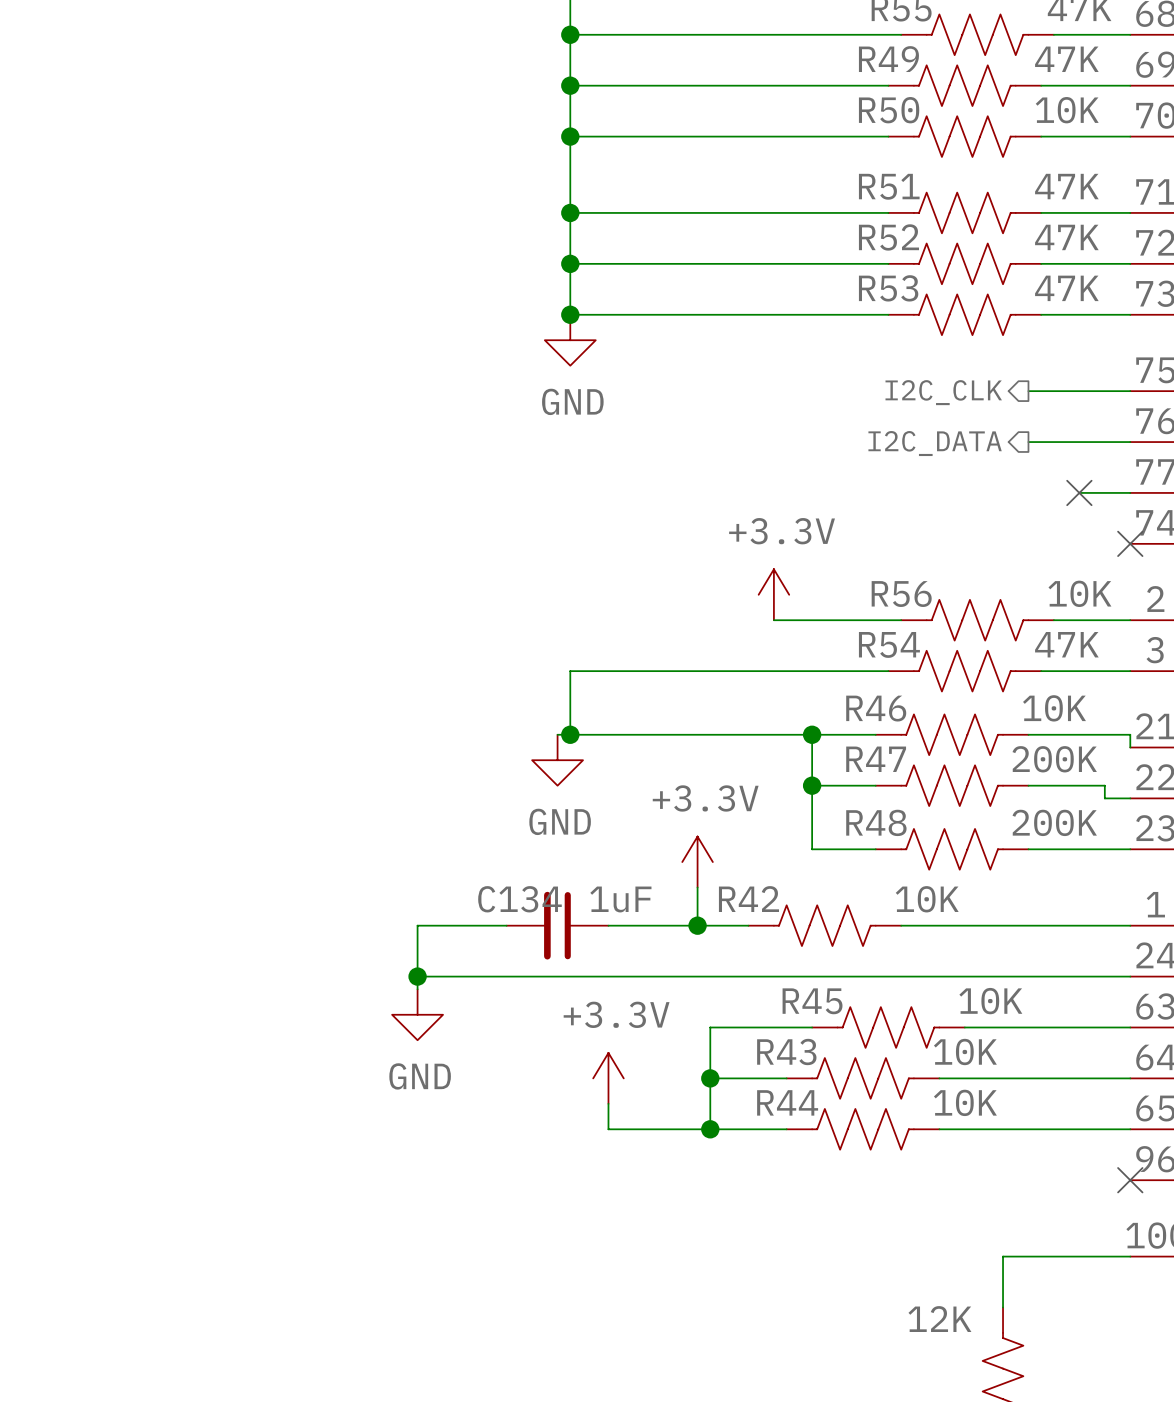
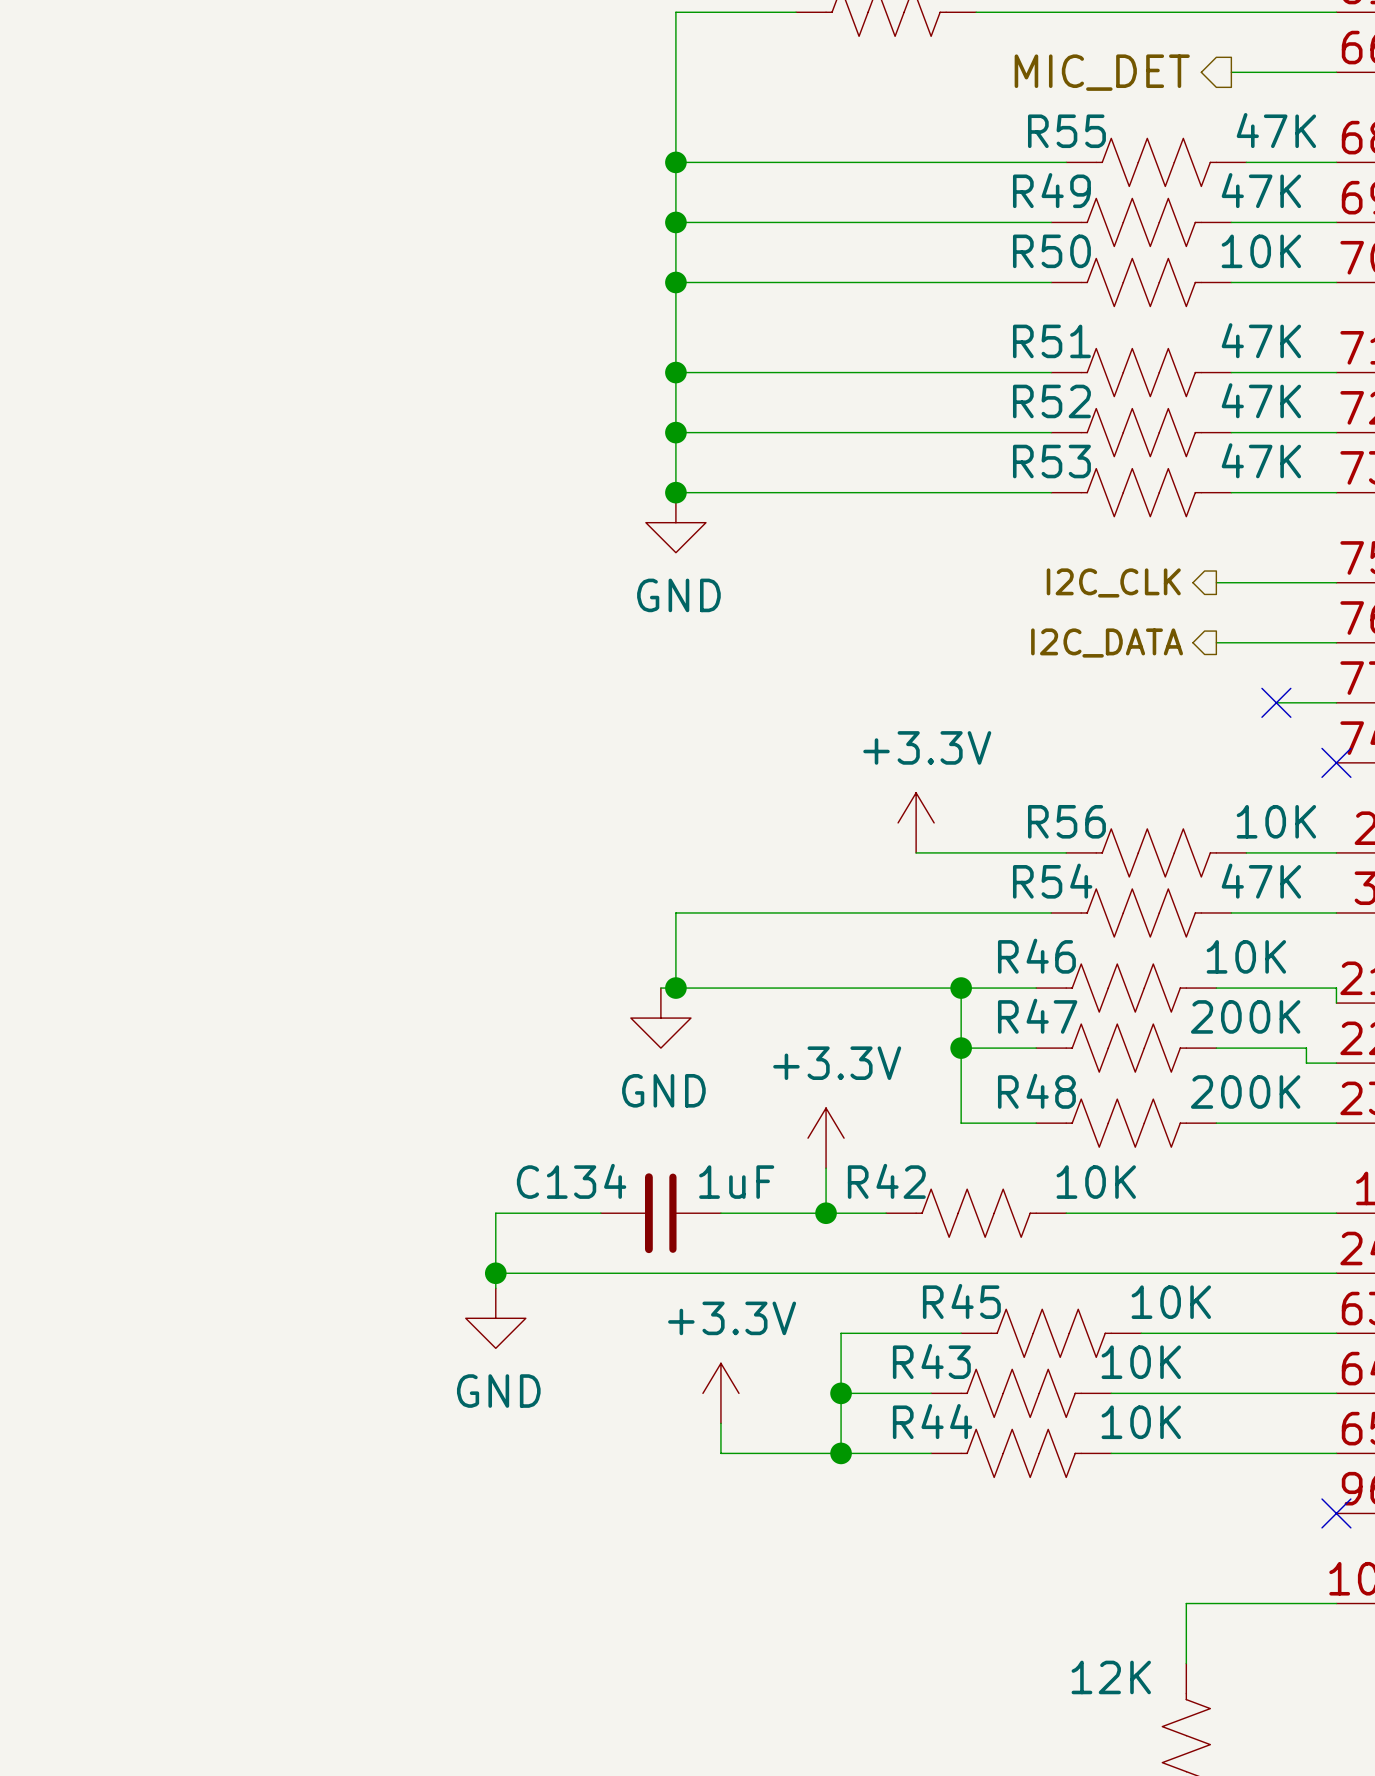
C134 name position: C134 (519, 899) -> C134 (571, 1181)

